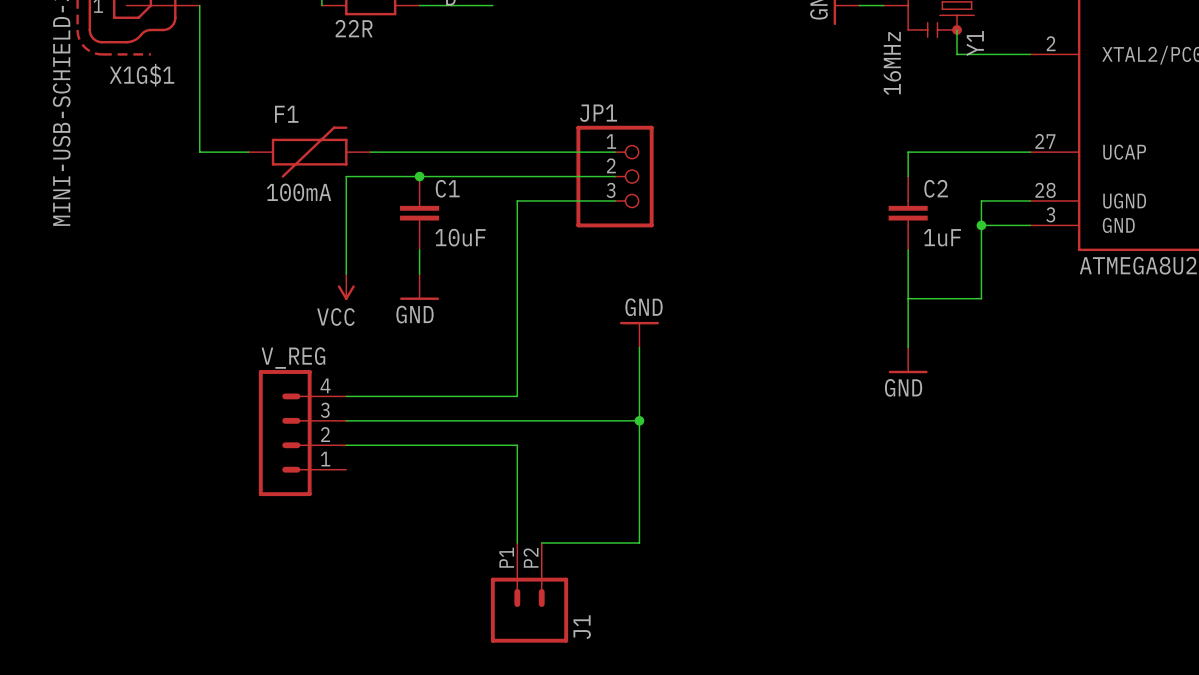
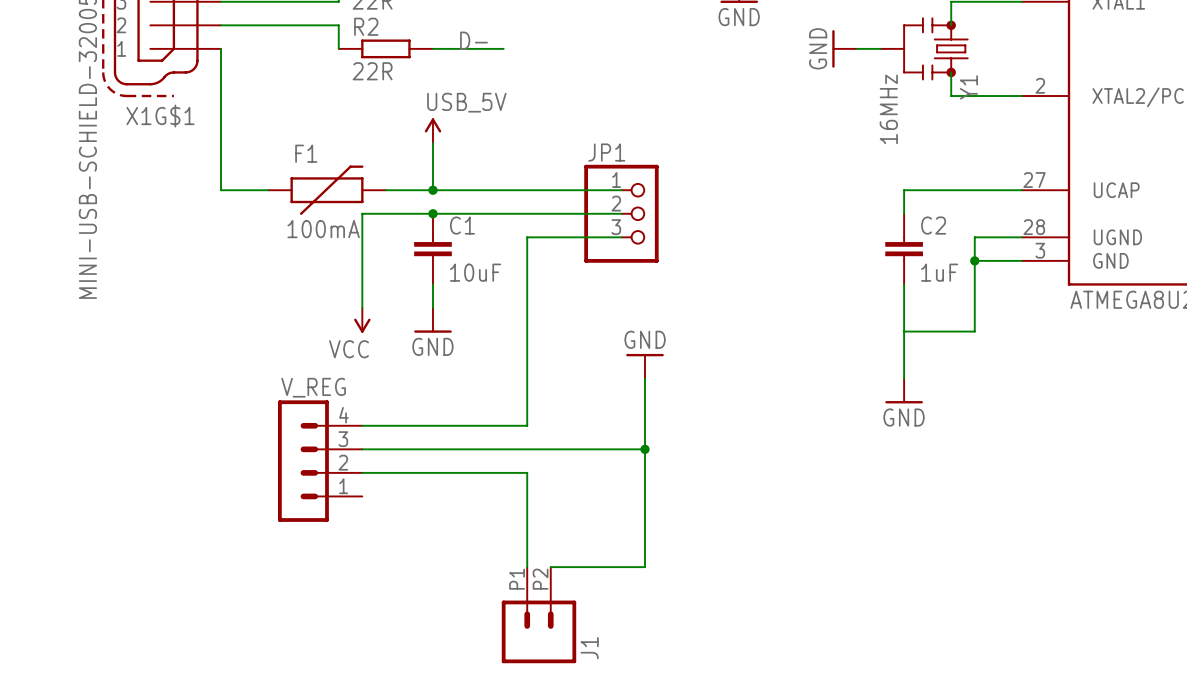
power symbol: none -> USB_5V (432, 130)
wire: none -> (432, 143) (432, 190)
junction: none -> (432, 190)

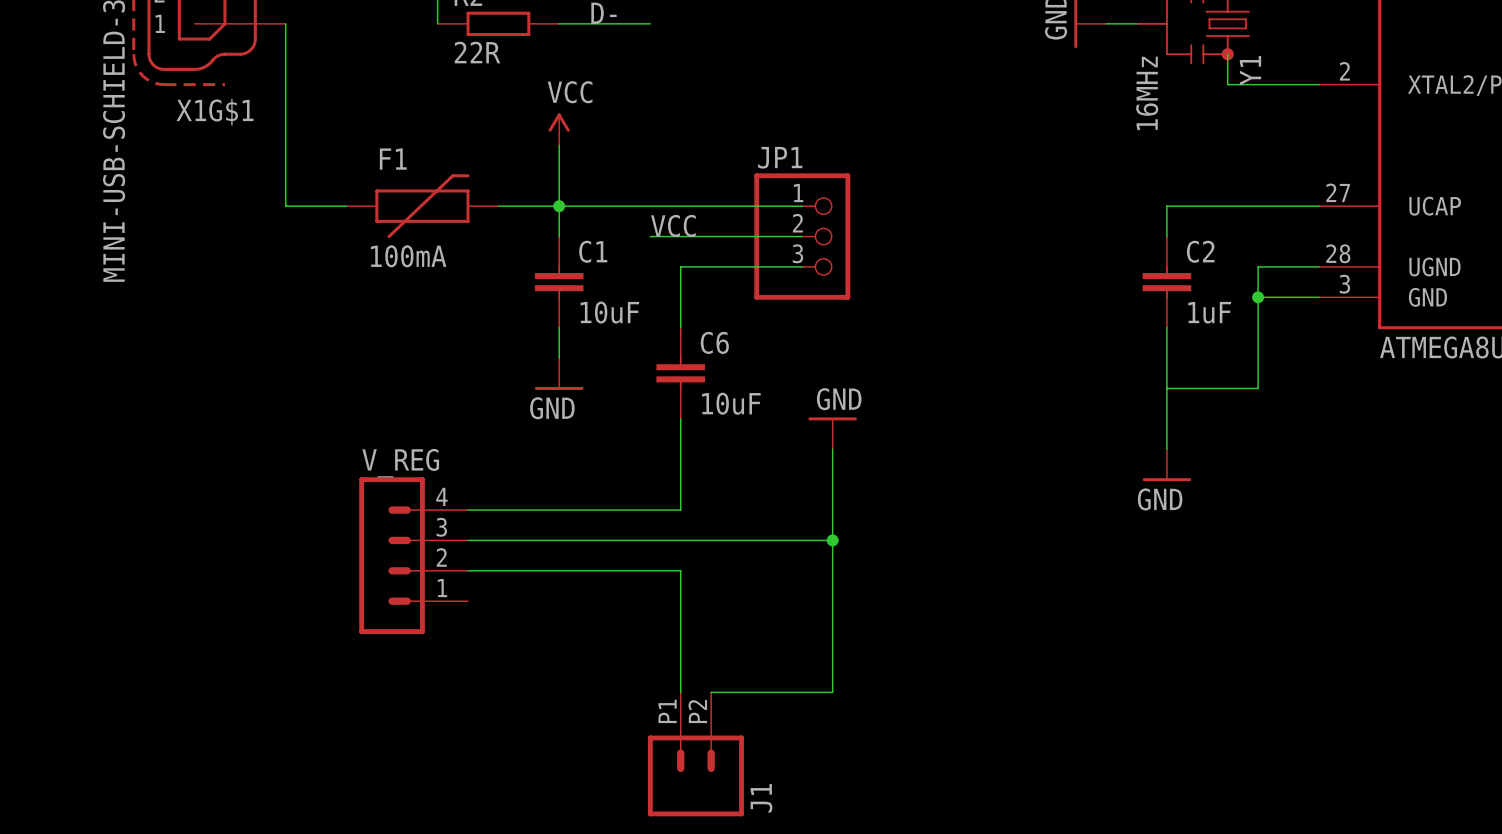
power symbol: USB_5V (432, 130) -> VCC (559, 129)
wire: none -> (559, 206) (559, 236)
label: none -> VCC (673, 225)
junction: (432, 213) -> none
wire: (503, 213) (362, 213) (362, 308) -> none
C6: none -> 10uF (680, 373)
power symbol: VCC (362, 320) -> none

